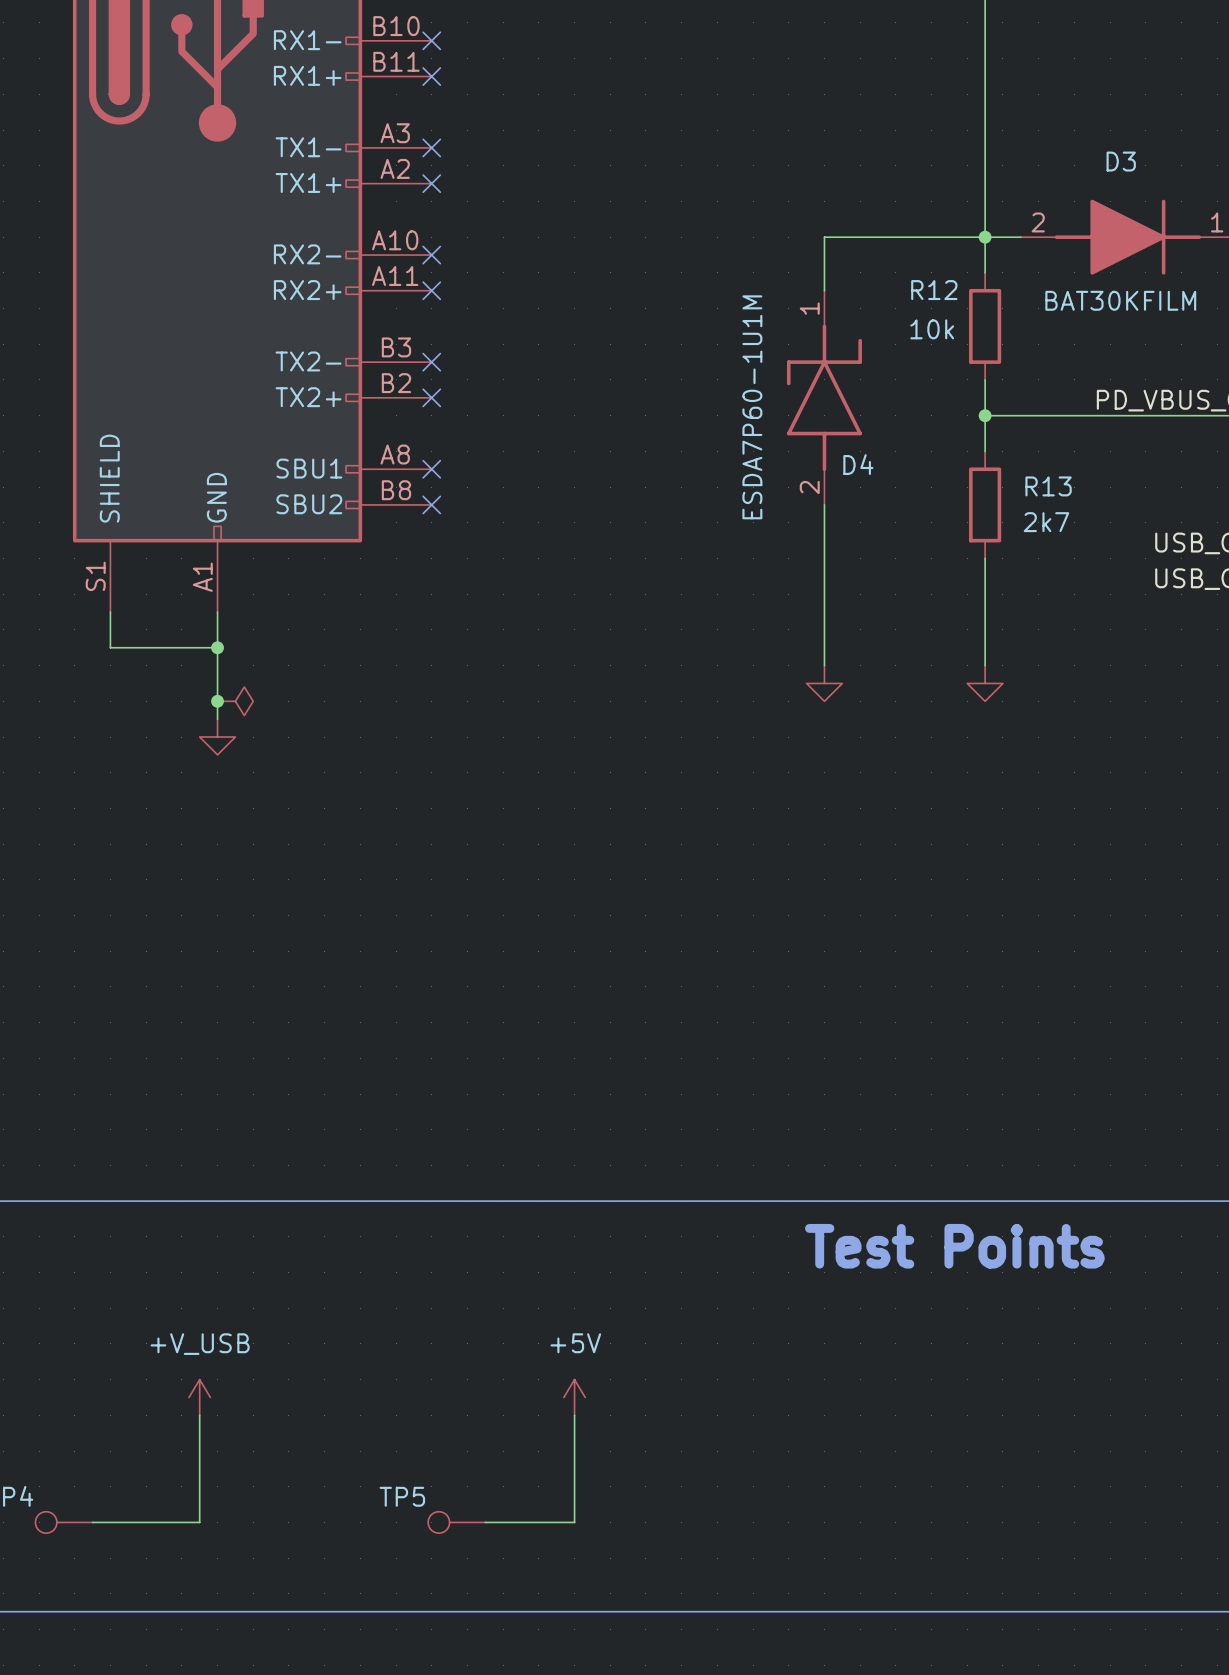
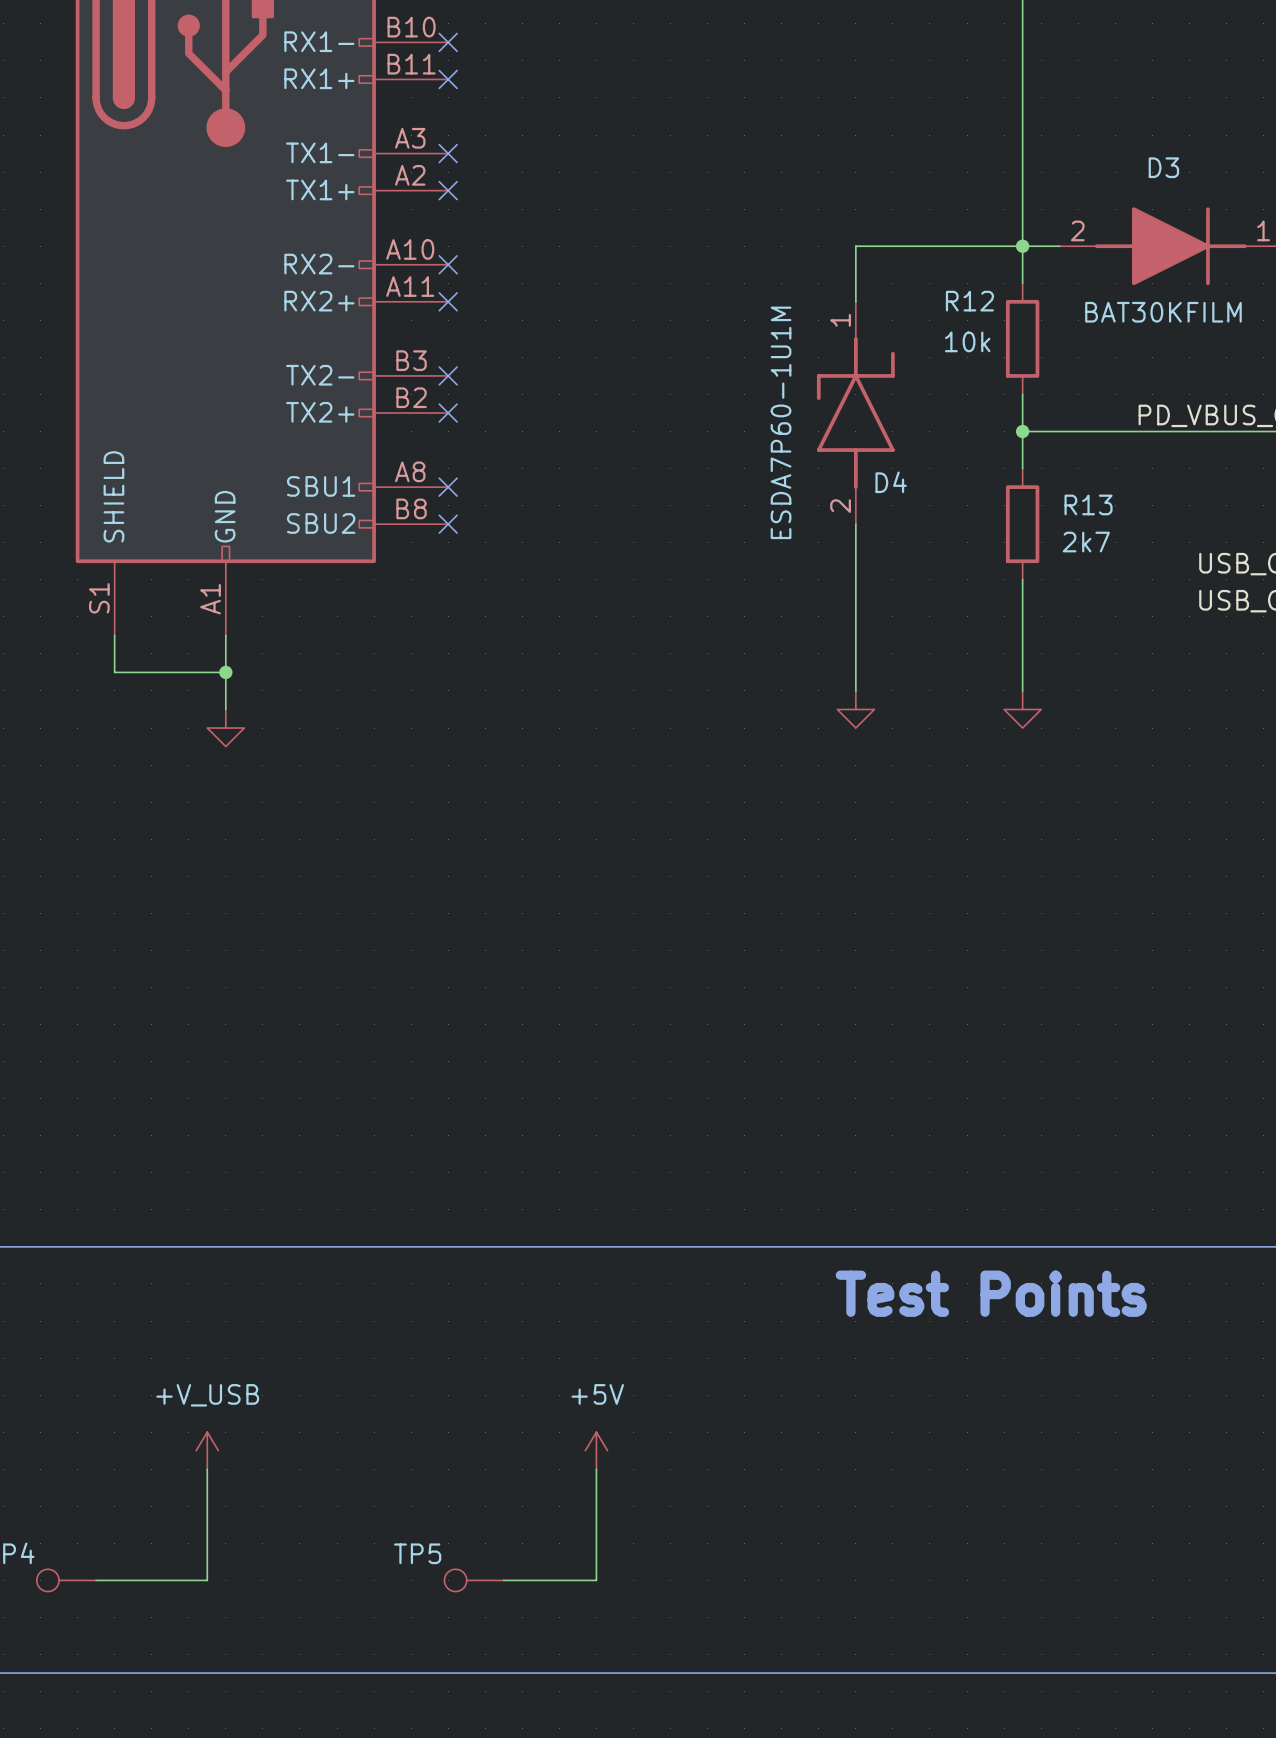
junction: (217, 701) -> none
power symbol: (235, 701) -> none
power symbol position: (217, 737) -> (225, 728)

